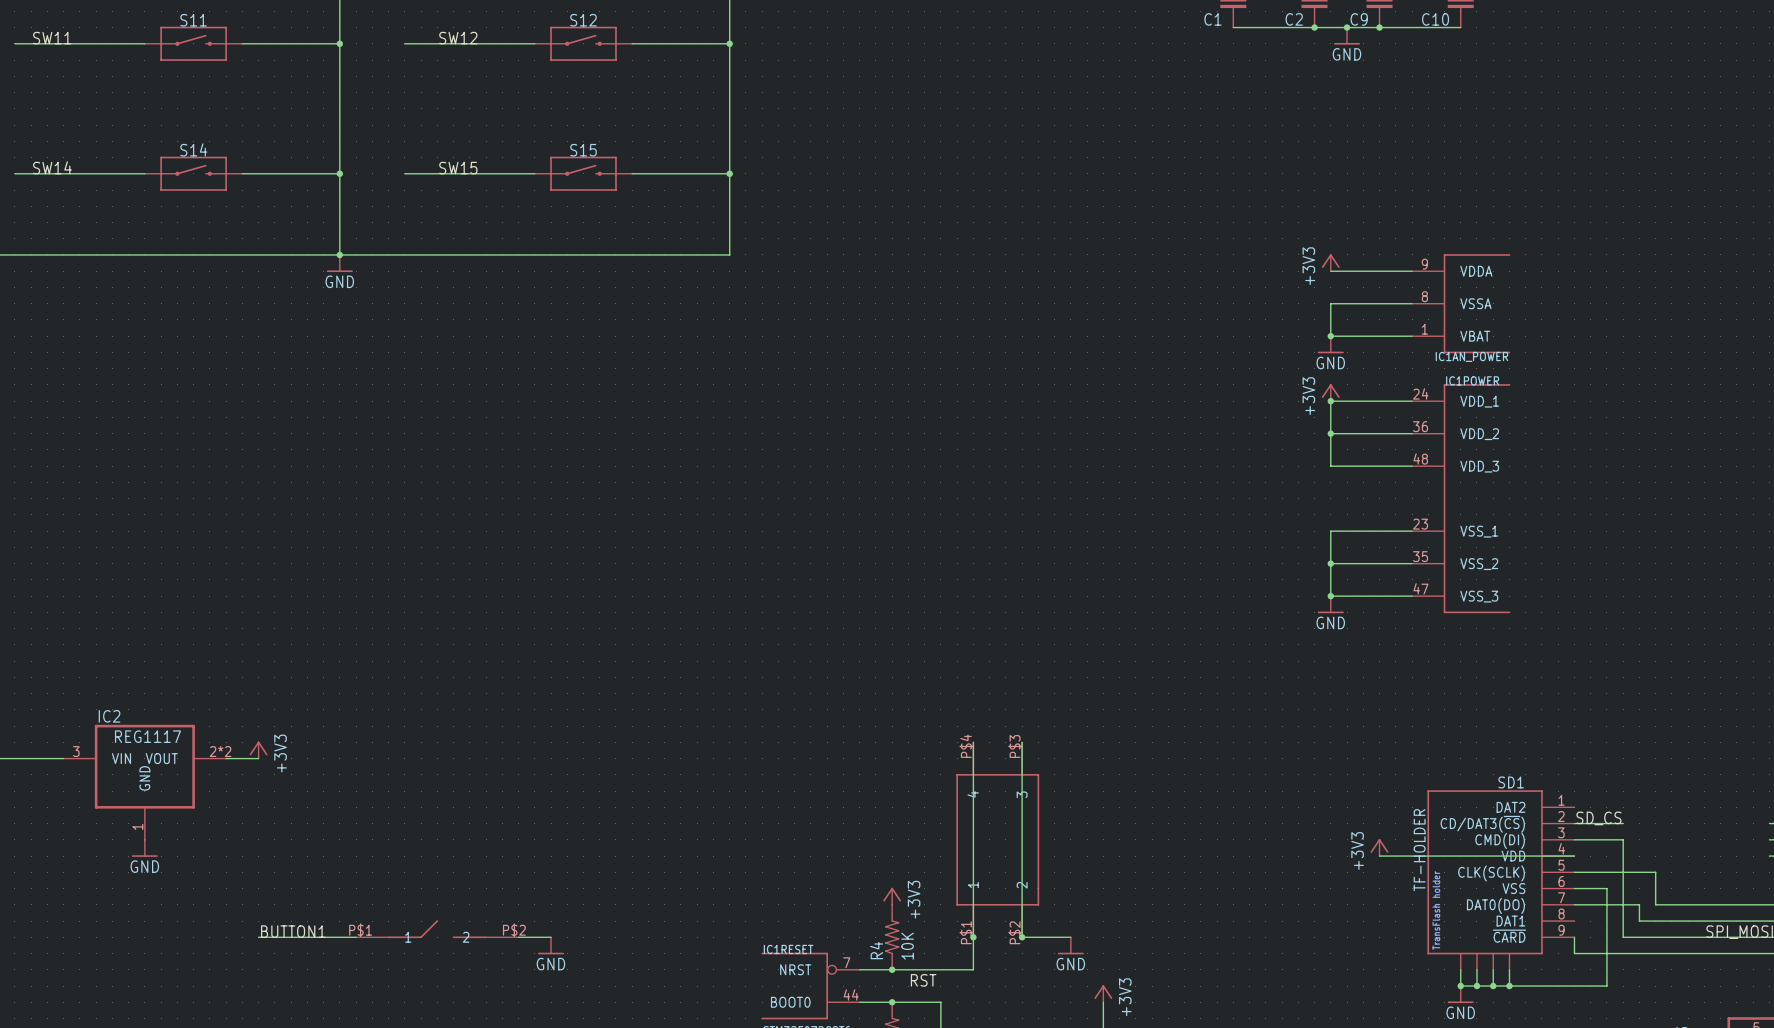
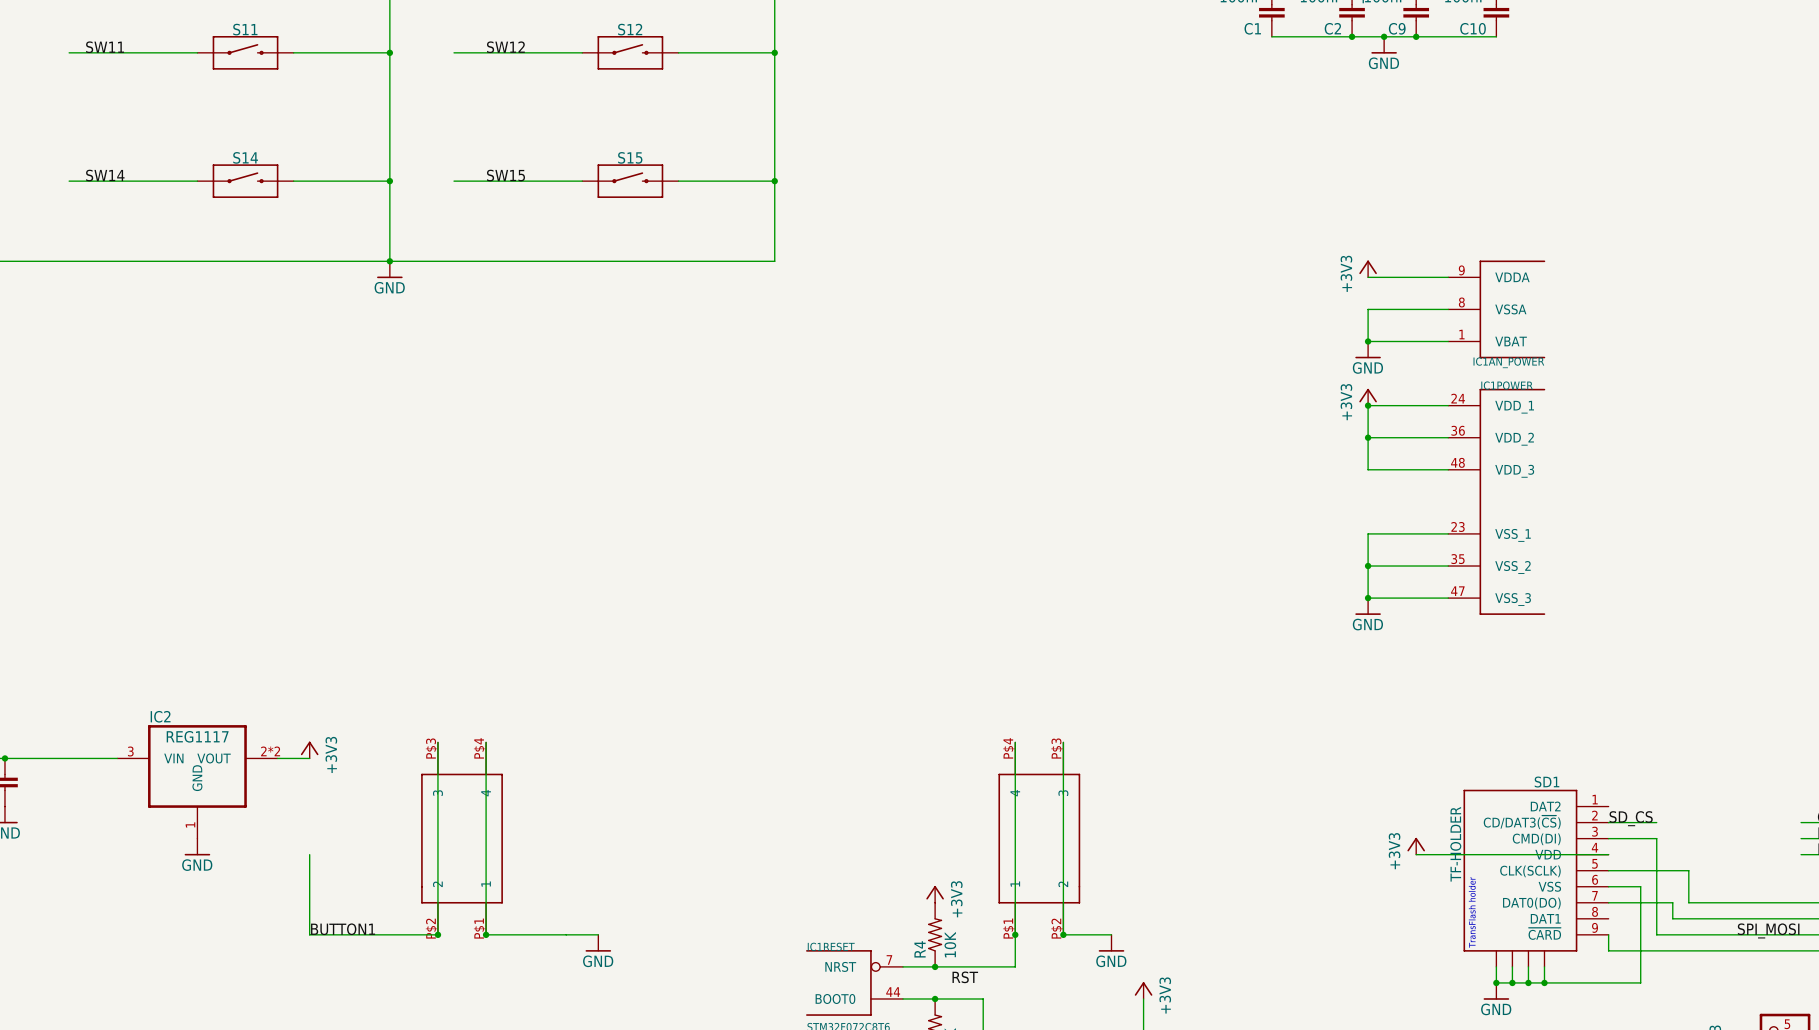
wire: none -> (437, 742) (437, 934) (405, 934)
wire: none -> (486, 742) (486, 934) (566, 934)
part: none -> (462, 838)
wire: none -> (309, 854) (309, 934)
part: (437, 929) -> none
junction: none -> (437, 934)
junction: none -> (486, 934)

